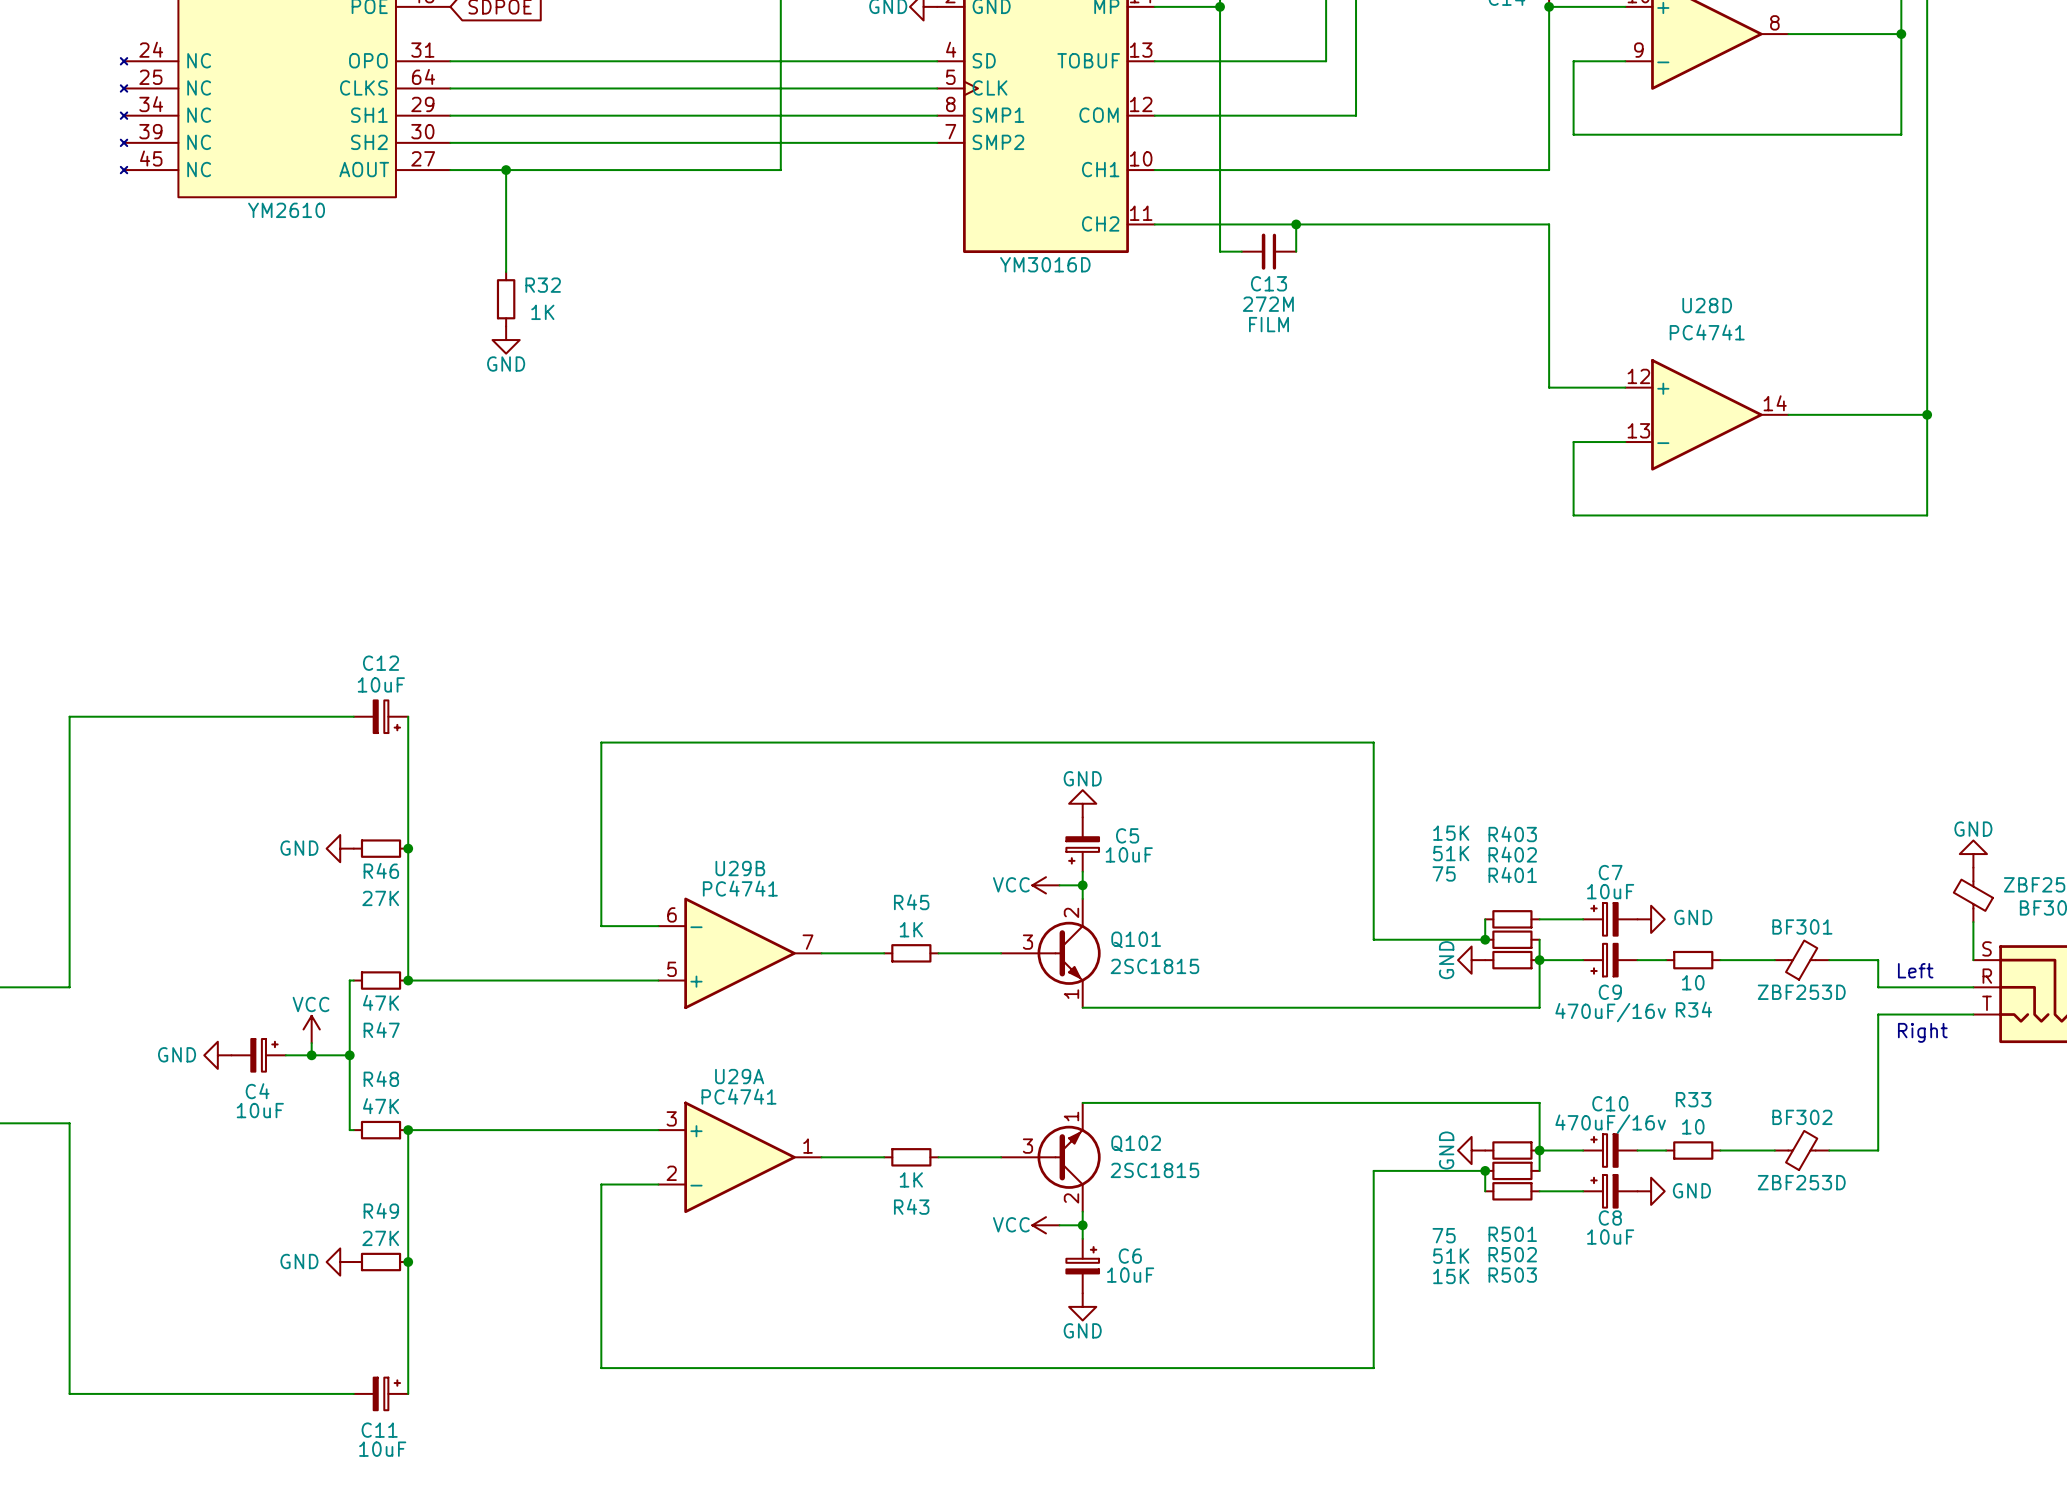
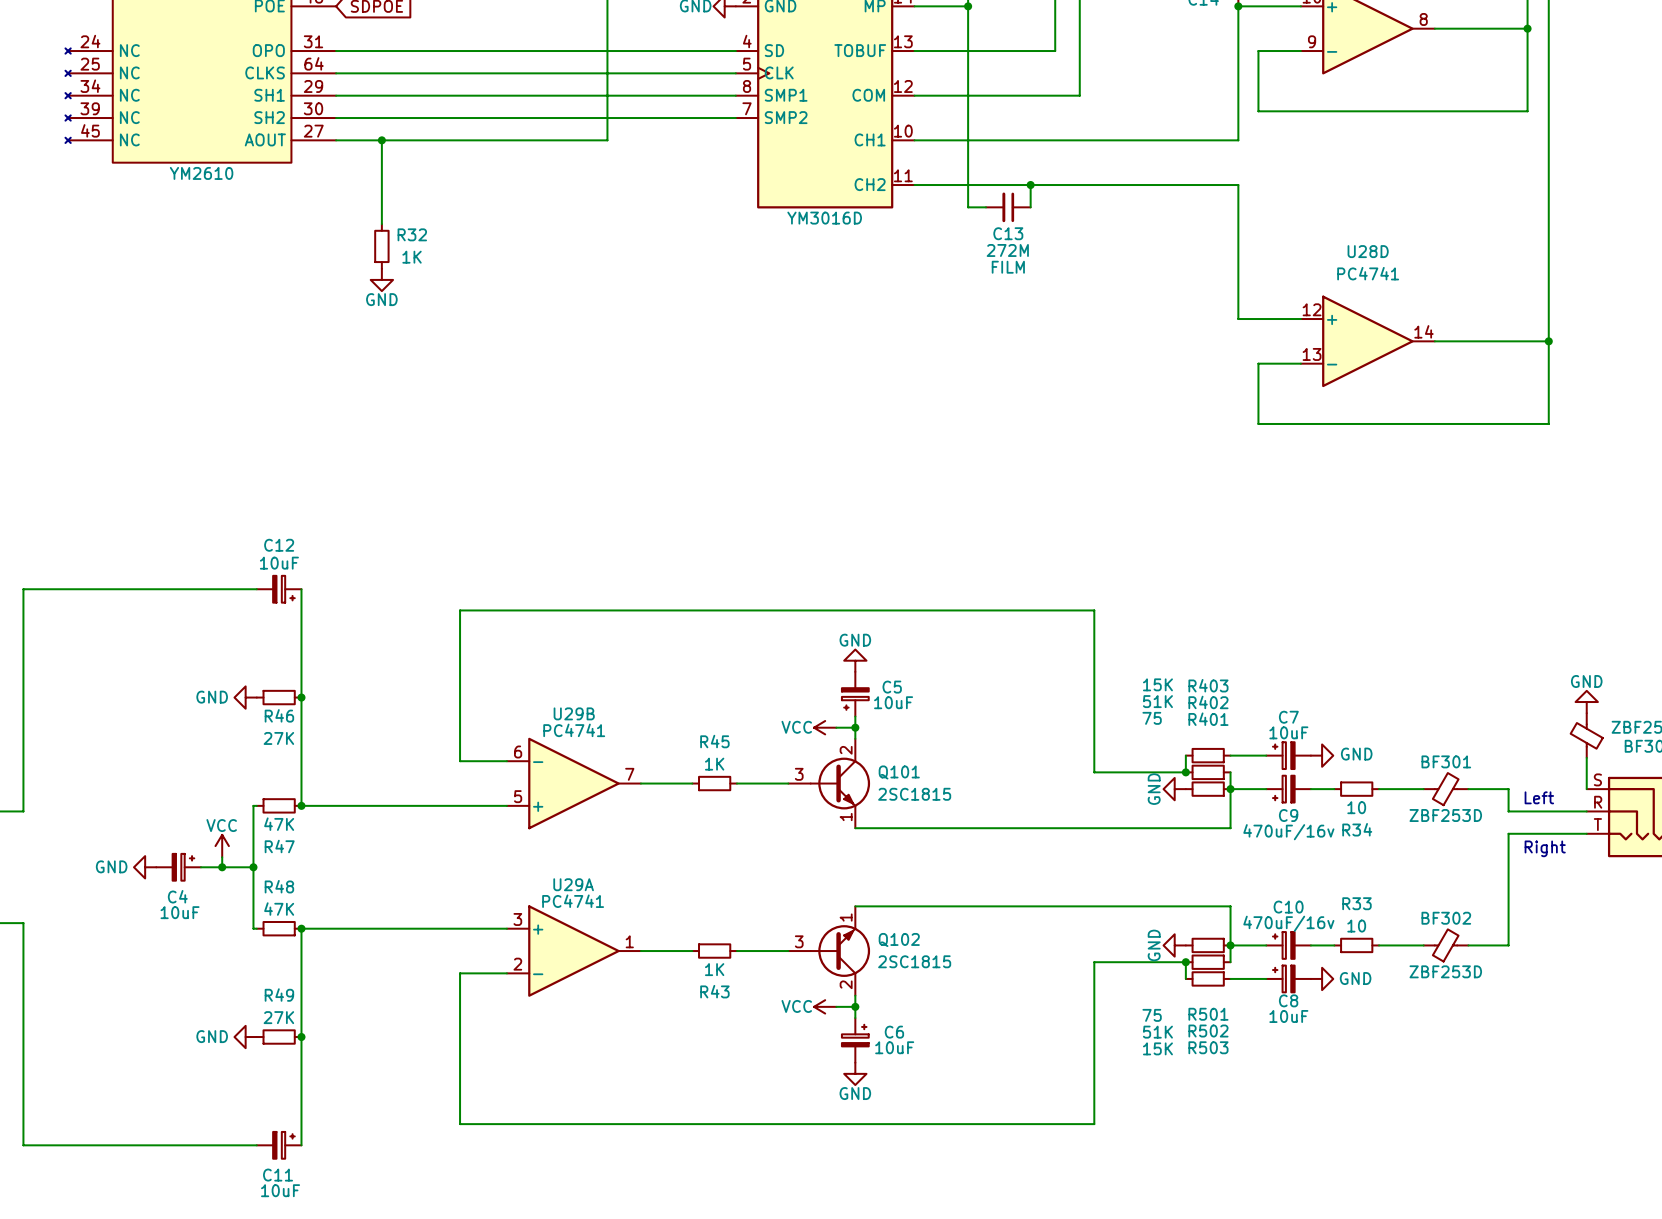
Q101 symbol: [1001, 898, 1101, 1008] -> [788, 738, 871, 829]
Q102 symbol: [1001, 1102, 1101, 1212] -> [788, 906, 871, 996]

